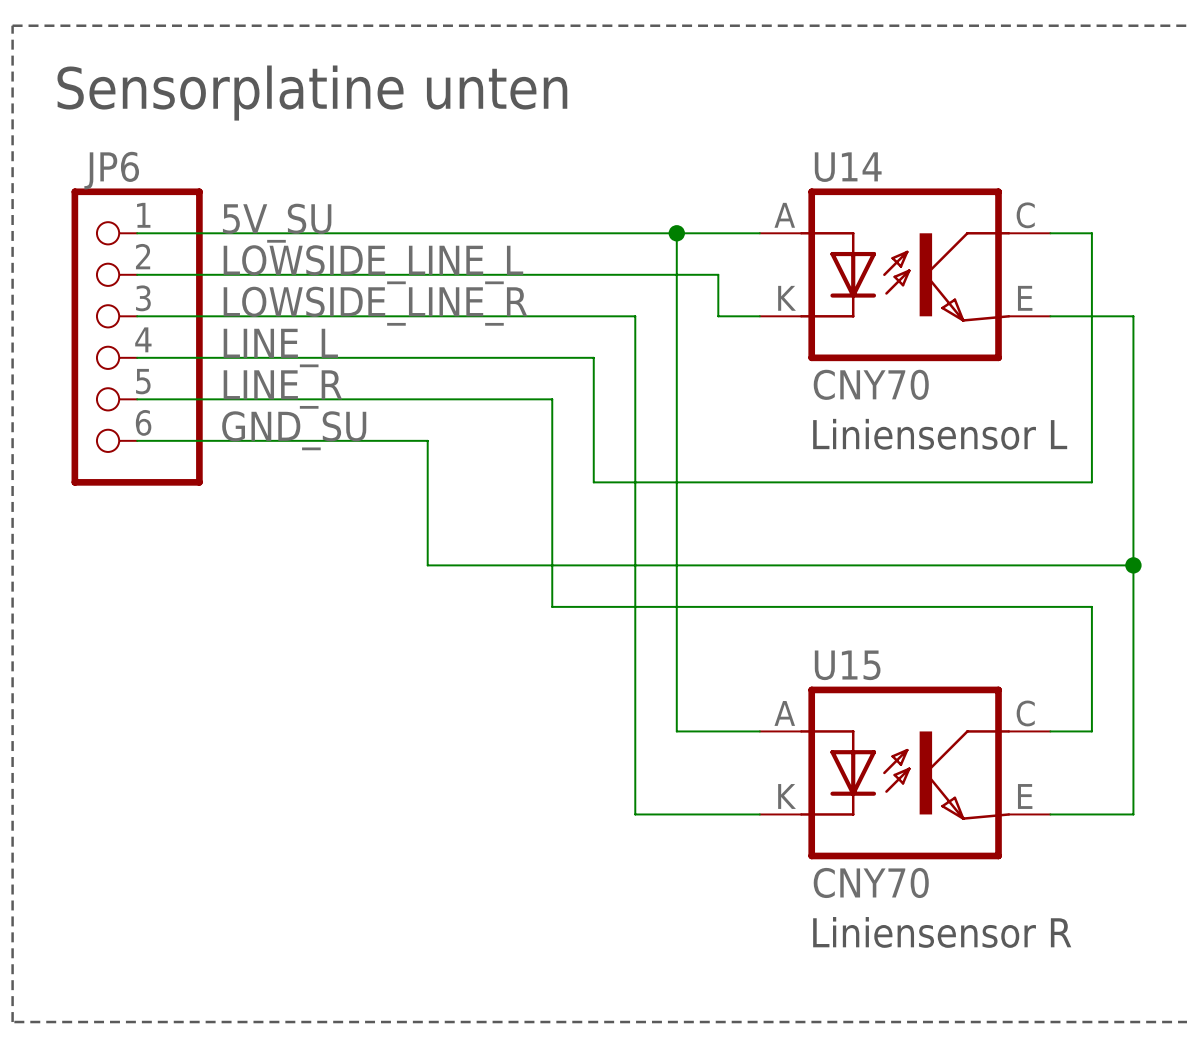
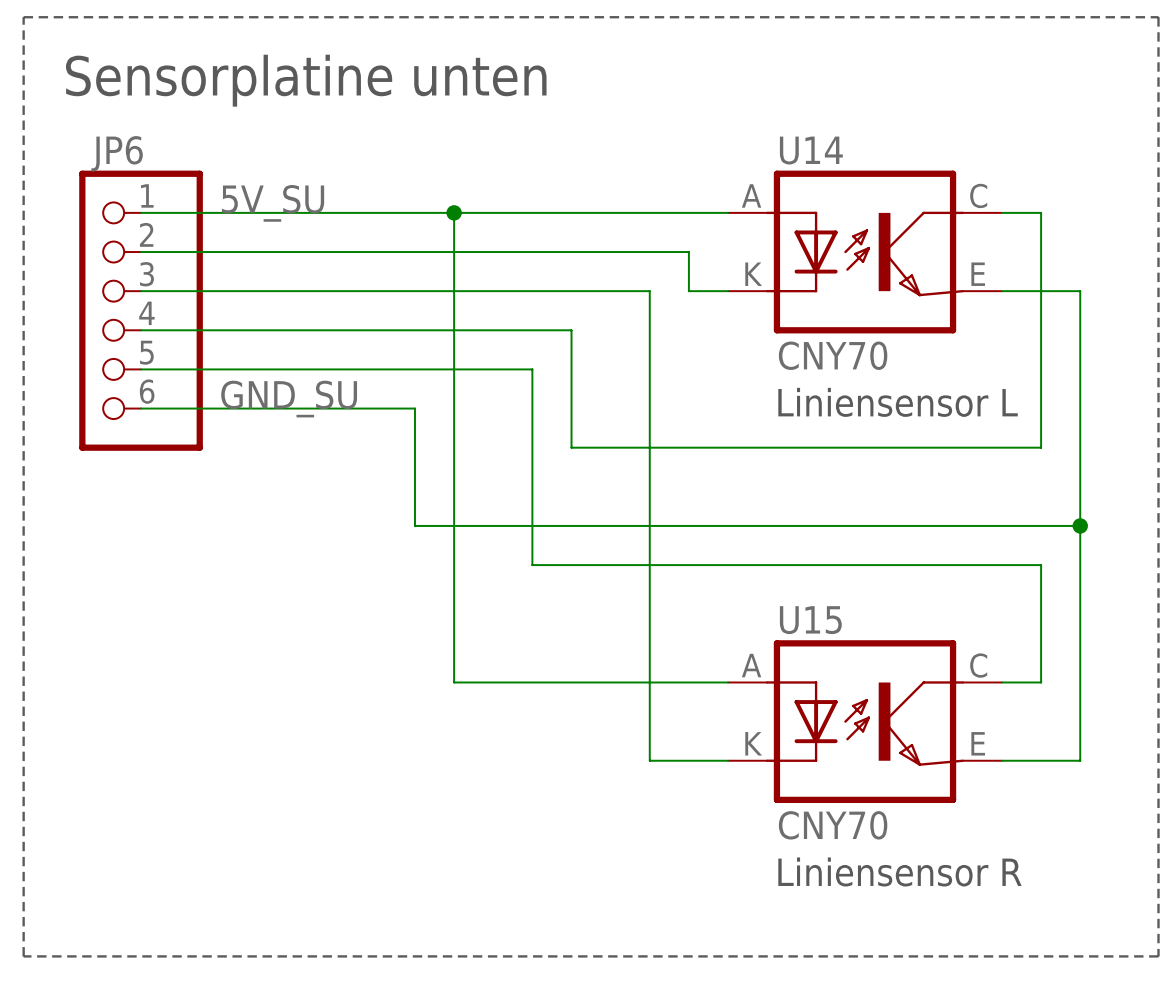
junction: none -> (454, 212)
wire: (676, 233) (676, 316) -> (610, 291) (649, 291)
junction: (676, 233) -> none
label: LOWSIDE_LINE_L (373, 264) -> none
label: LOWSIDE_LINE_R (375, 306) -> none
wire: (635, 316) (635, 814) (676, 814) -> (454, 212) (454, 682) (649, 682) (649, 760)
label: LINE_L (280, 347) -> none
label: LINE_R (282, 389) -> none

